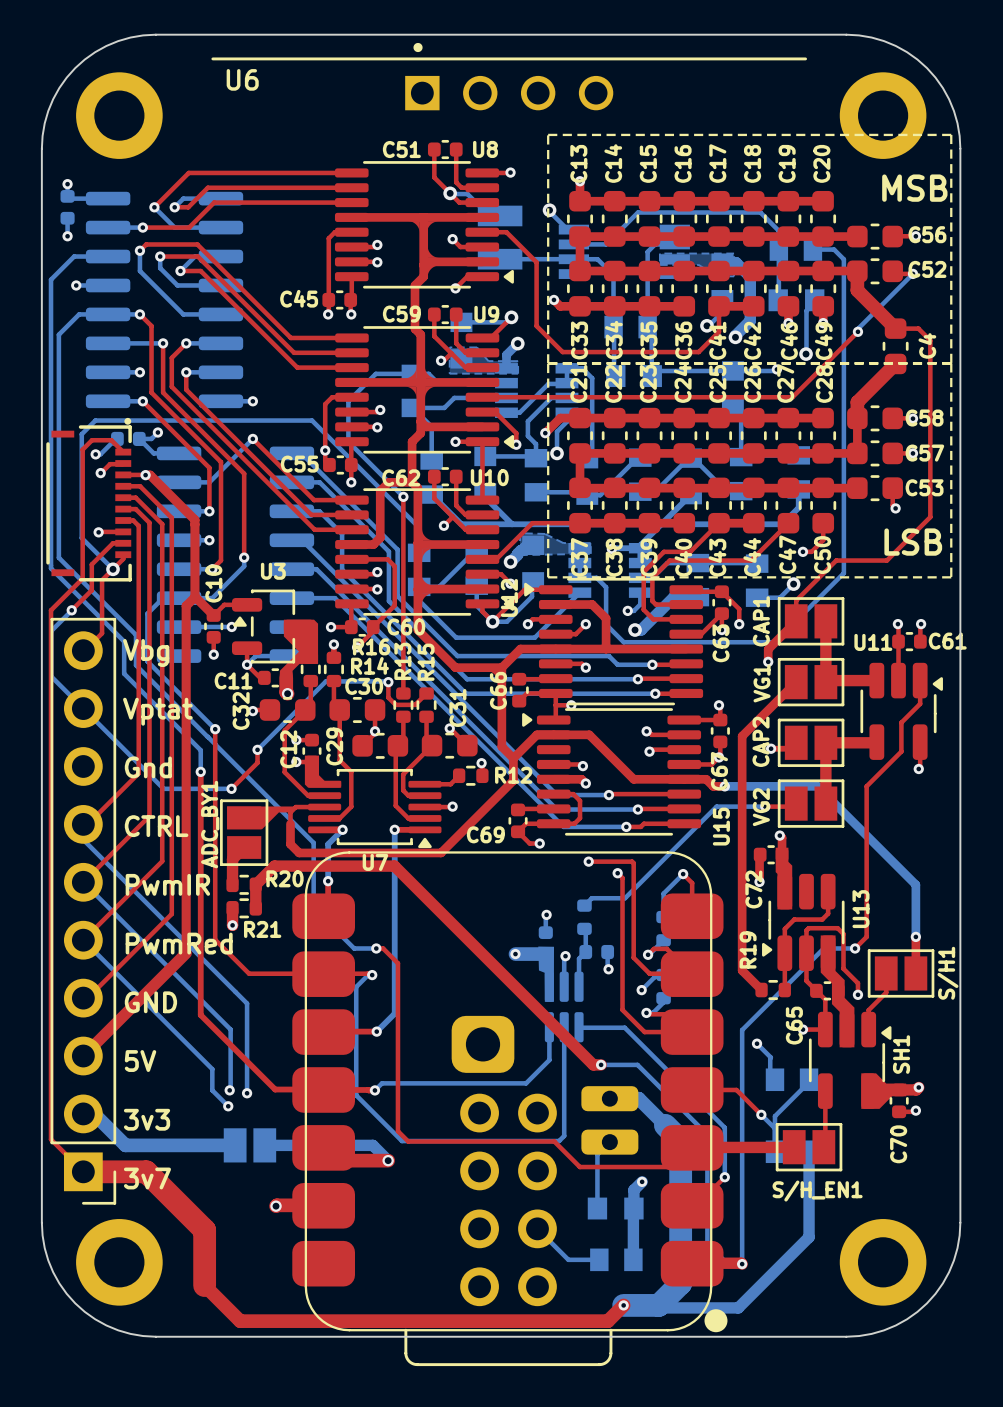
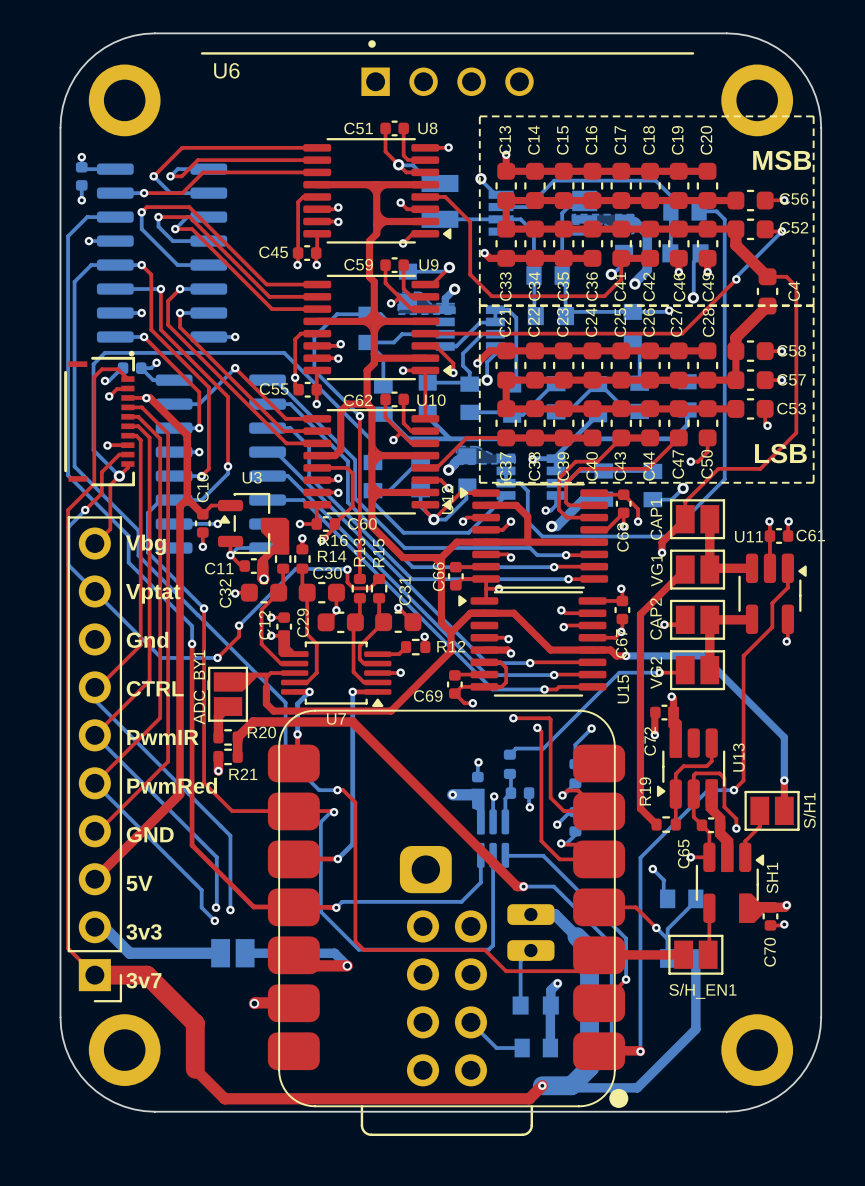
top track: (683, 874) (692, 883) (692, 916) -> none

